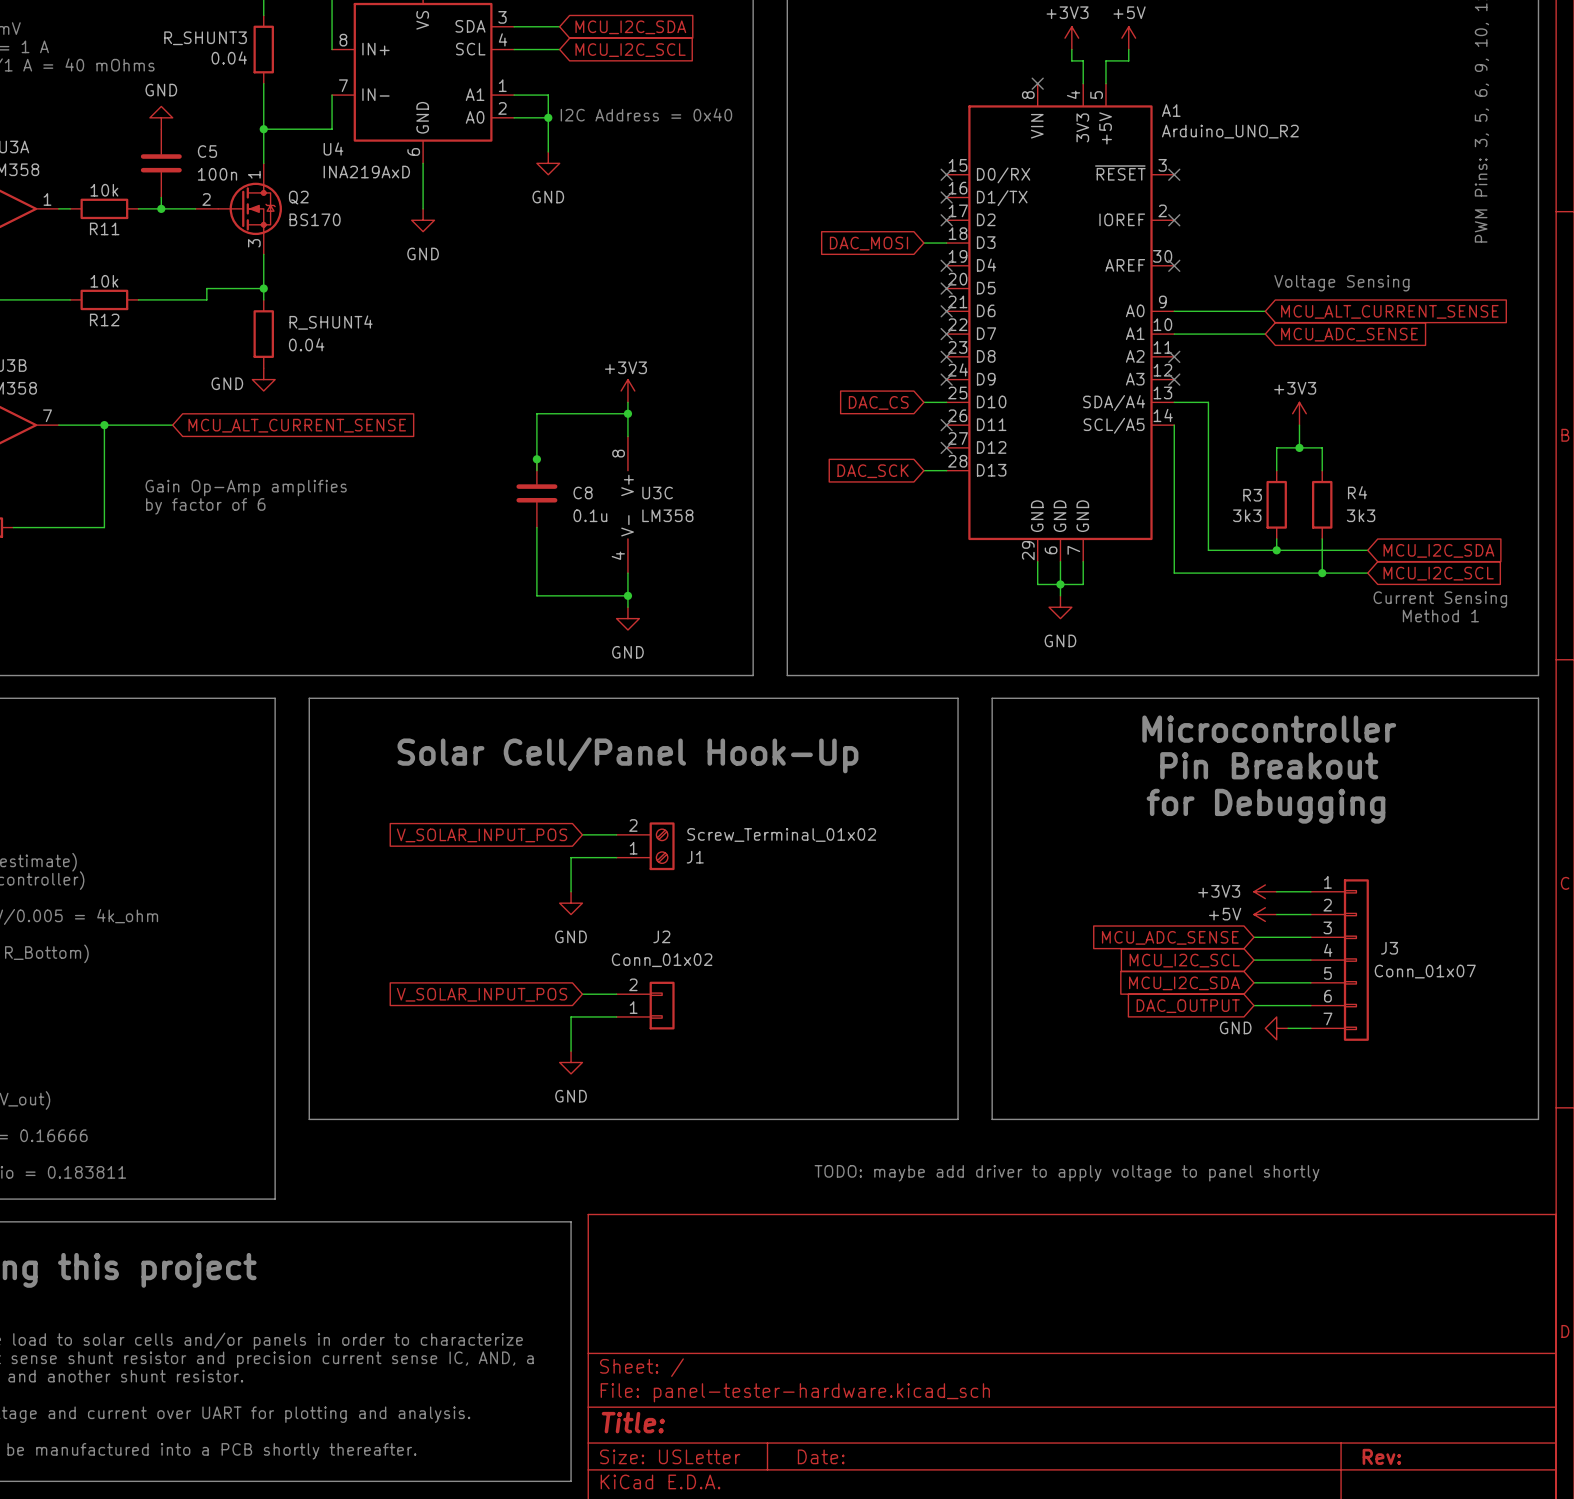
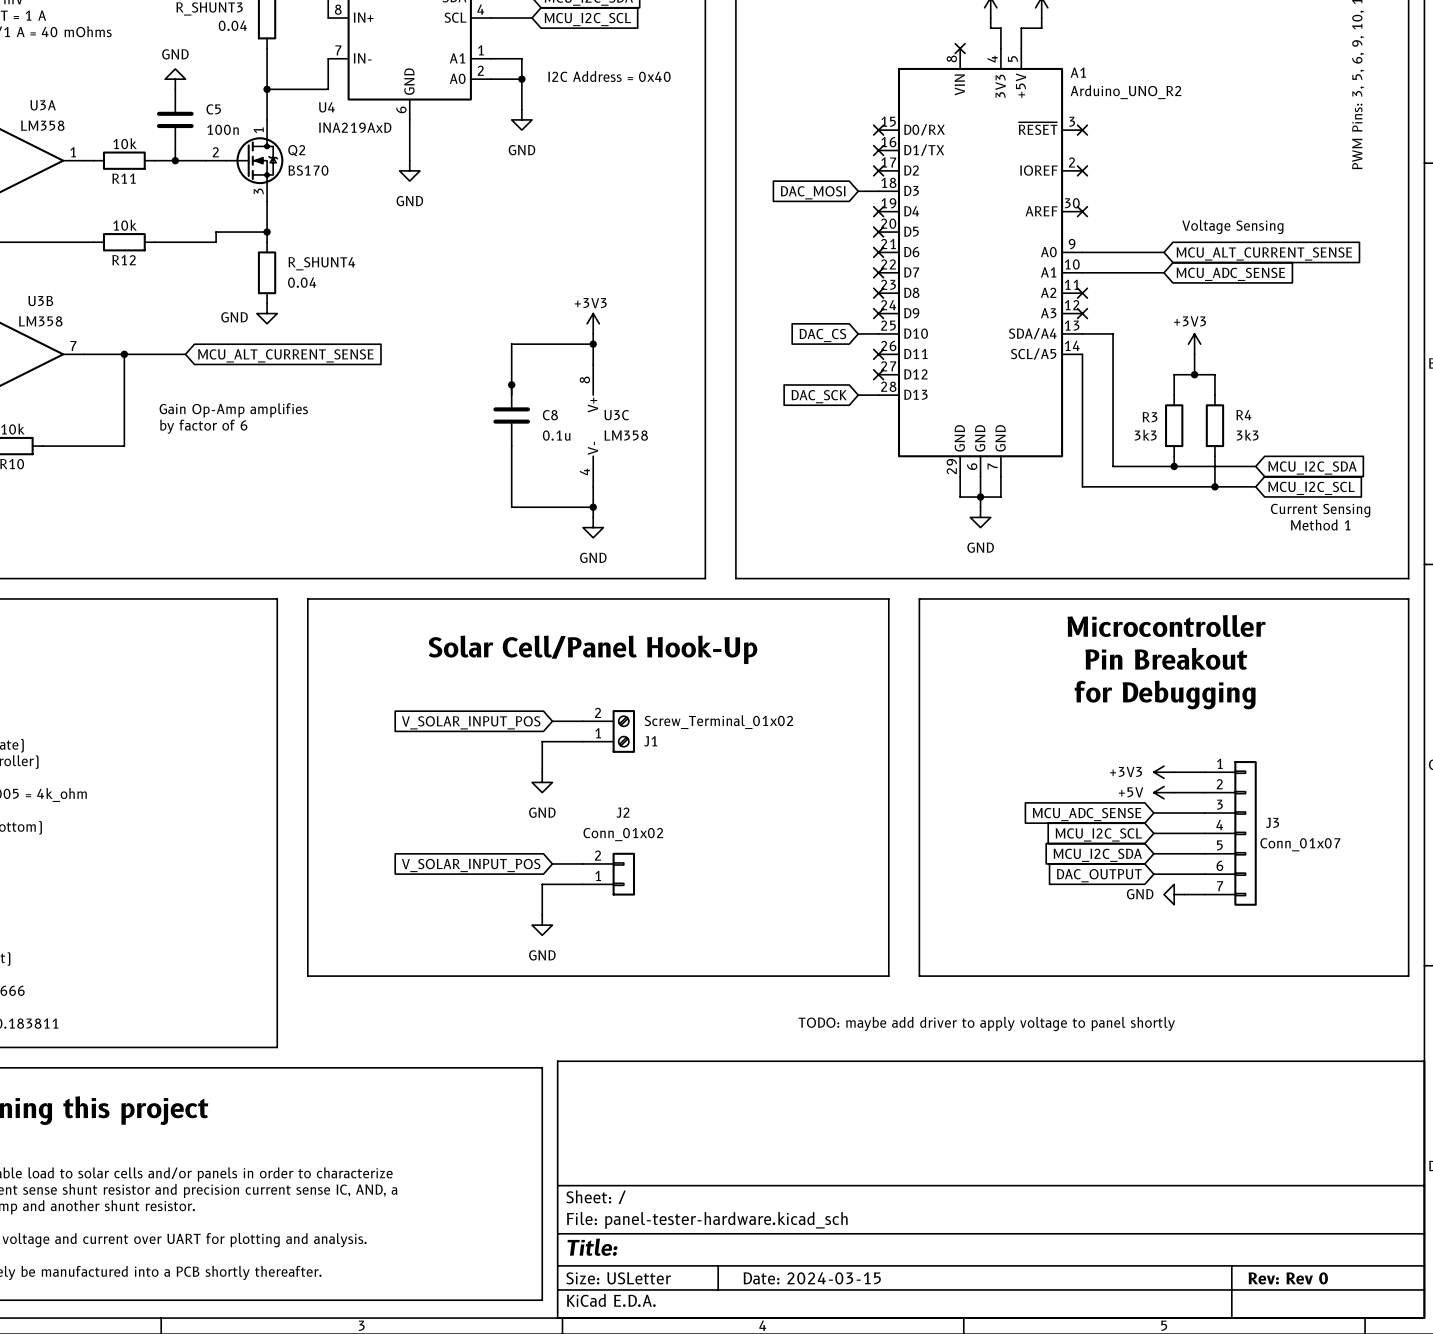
title block: Date: (821, 1456) -> Date: 2024-03-15 (812, 1278)
title block: Rev: (1381, 1456) -> Rev: Rev 0 (1288, 1278)

